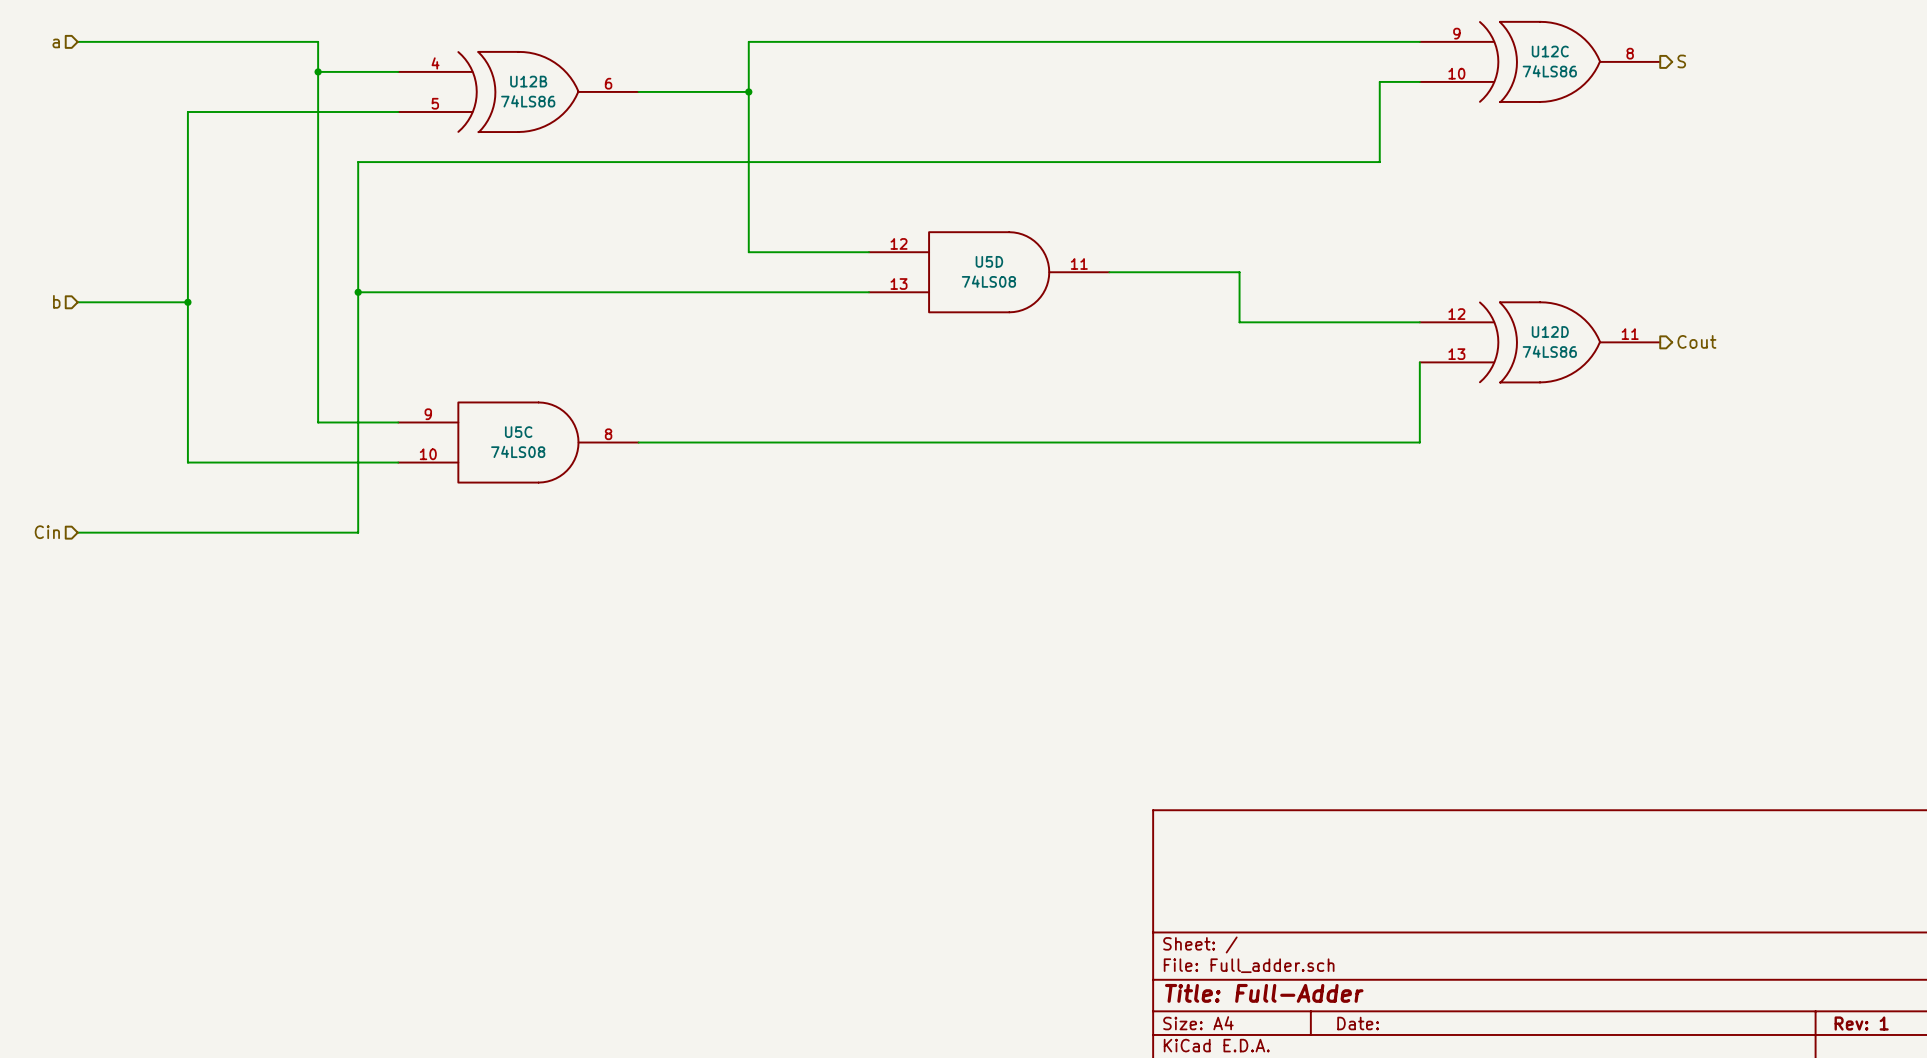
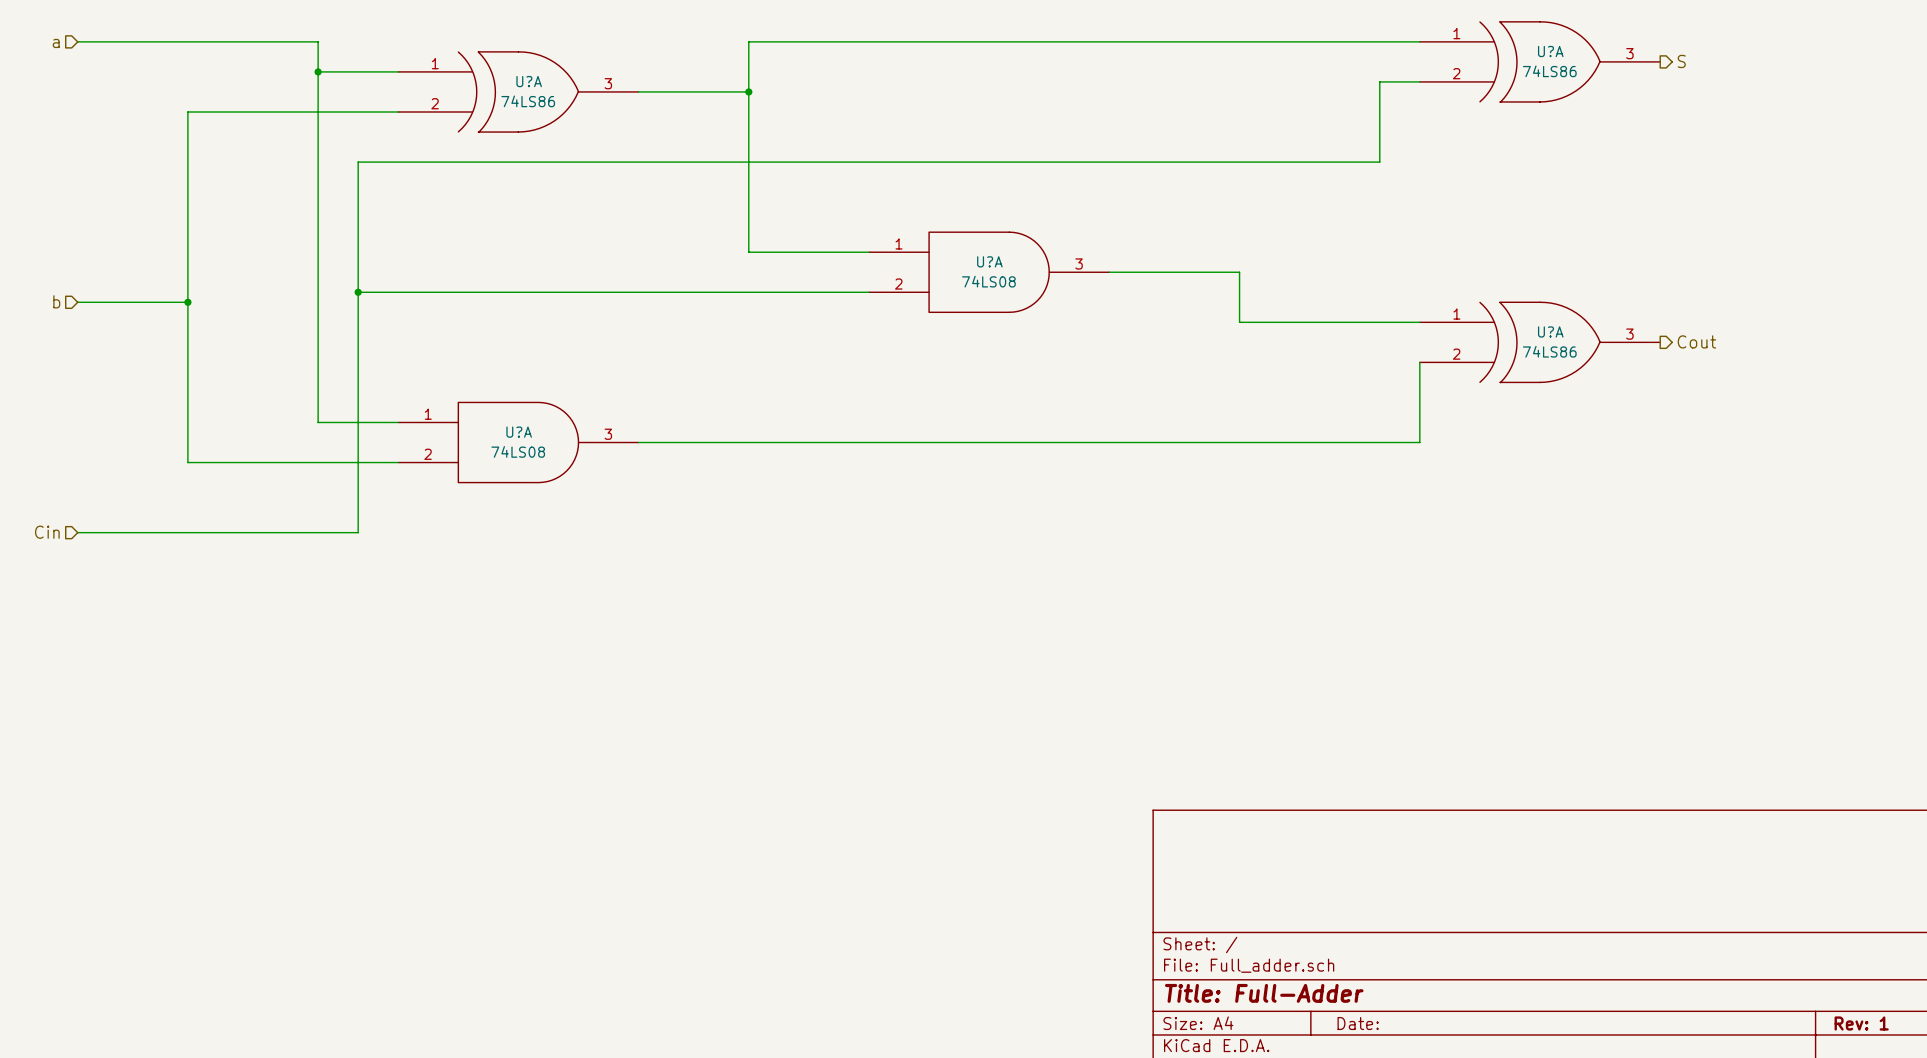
U12C pin number: 9 (1456, 33) -> 1 (1456, 33)
U12C name: U12C (1550, 51) -> U?A (1550, 51)
U12C pin number: 8 (1630, 53) -> 3 (1629, 53)
U12B pin number: 4 (435, 63) -> 1 (435, 63)
U12C pin number: 10 (1456, 73) -> 2 (1456, 73)
U12B name: U12B (528, 81) -> U?A (529, 81)
U12B pin number: 6 (608, 83) -> 3 (608, 83)
U12B pin number: 5 (435, 103) -> 2 (435, 103)
U5D pin number: 12 (899, 243) -> 1 (899, 243)
U5D name: U5D (989, 261) -> U?A (989, 261)
U5D pin number: 11 (1079, 263) -> 3 (1079, 263)
U5D pin number: 13 (899, 284) -> 2 (898, 284)
U12D pin number: 12 (1456, 314) -> 1 (1456, 314)
U12D name: U12D (1550, 331) -> U?A (1550, 331)
U12D pin number: 11 (1630, 334) -> 3 (1629, 334)
U12D pin number: 13 (1456, 354) -> 2 (1456, 354)
U5C pin number: 9 (428, 414) -> 1 (428, 414)
U5C name: U5C (518, 432) -> U?A (519, 432)
U5C pin number: 8 (608, 434) -> 3 (608, 434)
U5C pin number: 10 (428, 454) -> 2 (428, 454)

